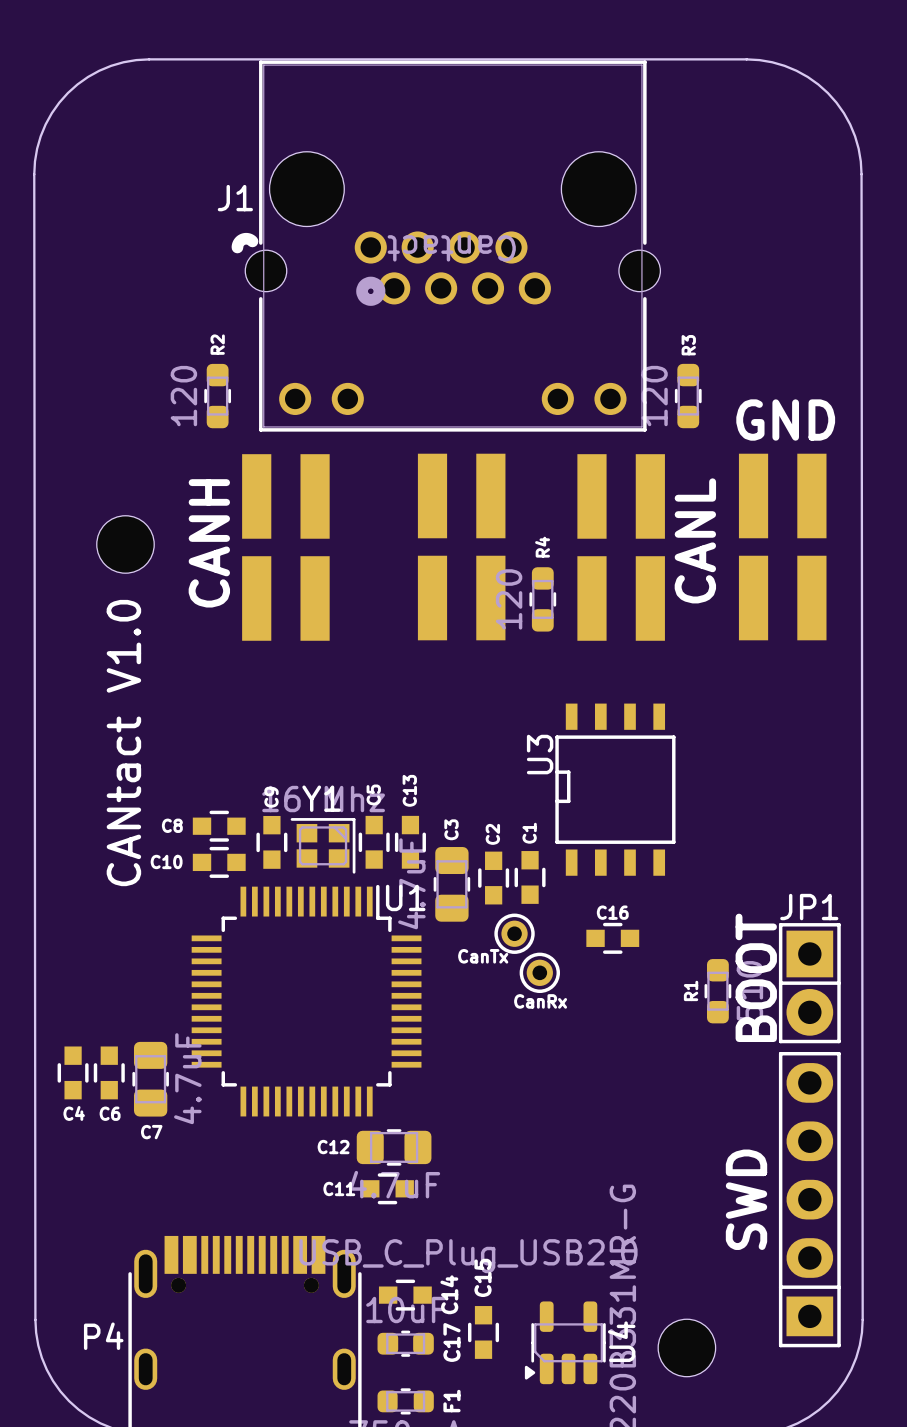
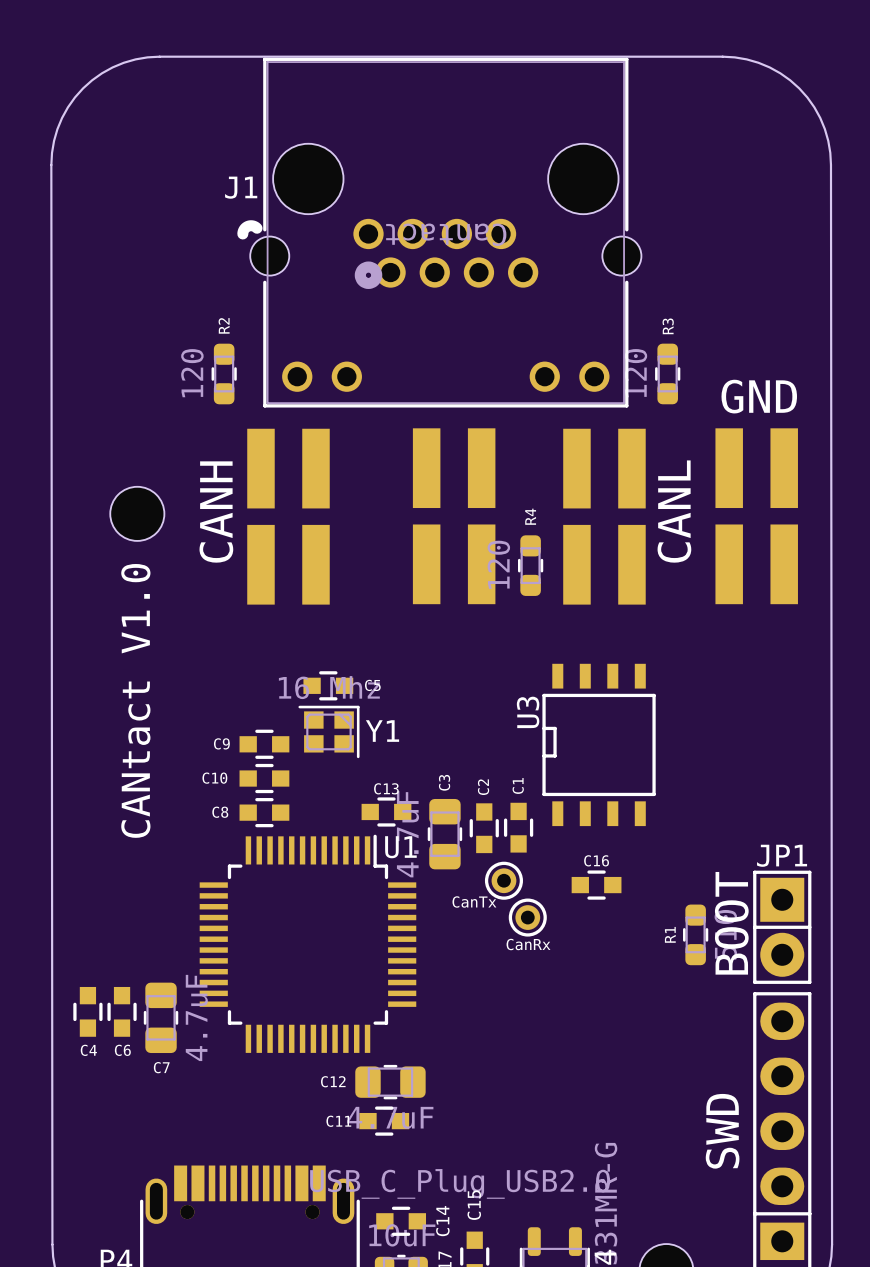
C9 name position: C9 (271, 797) -> C9 (221, 743)
Y1 name position: Y1 (321, 798) -> Y1 (382, 731)
C8 position: (219, 826) -> (264, 812)
C9 rotation: 0° (271, 842) -> 90° clockwise (264, 744)
C9 position: (271, 842) -> (264, 744)
C5 rotation: 0° (374, 842) -> 90° clockwise (328, 685)
C5 position: (374, 842) -> (328, 685)
C13 rotation: 0° (410, 842) -> 90° clockwise (386, 811)
Y1 position: (323, 845) -> (328, 731)
C10 position: (219, 862) -> (264, 778)

